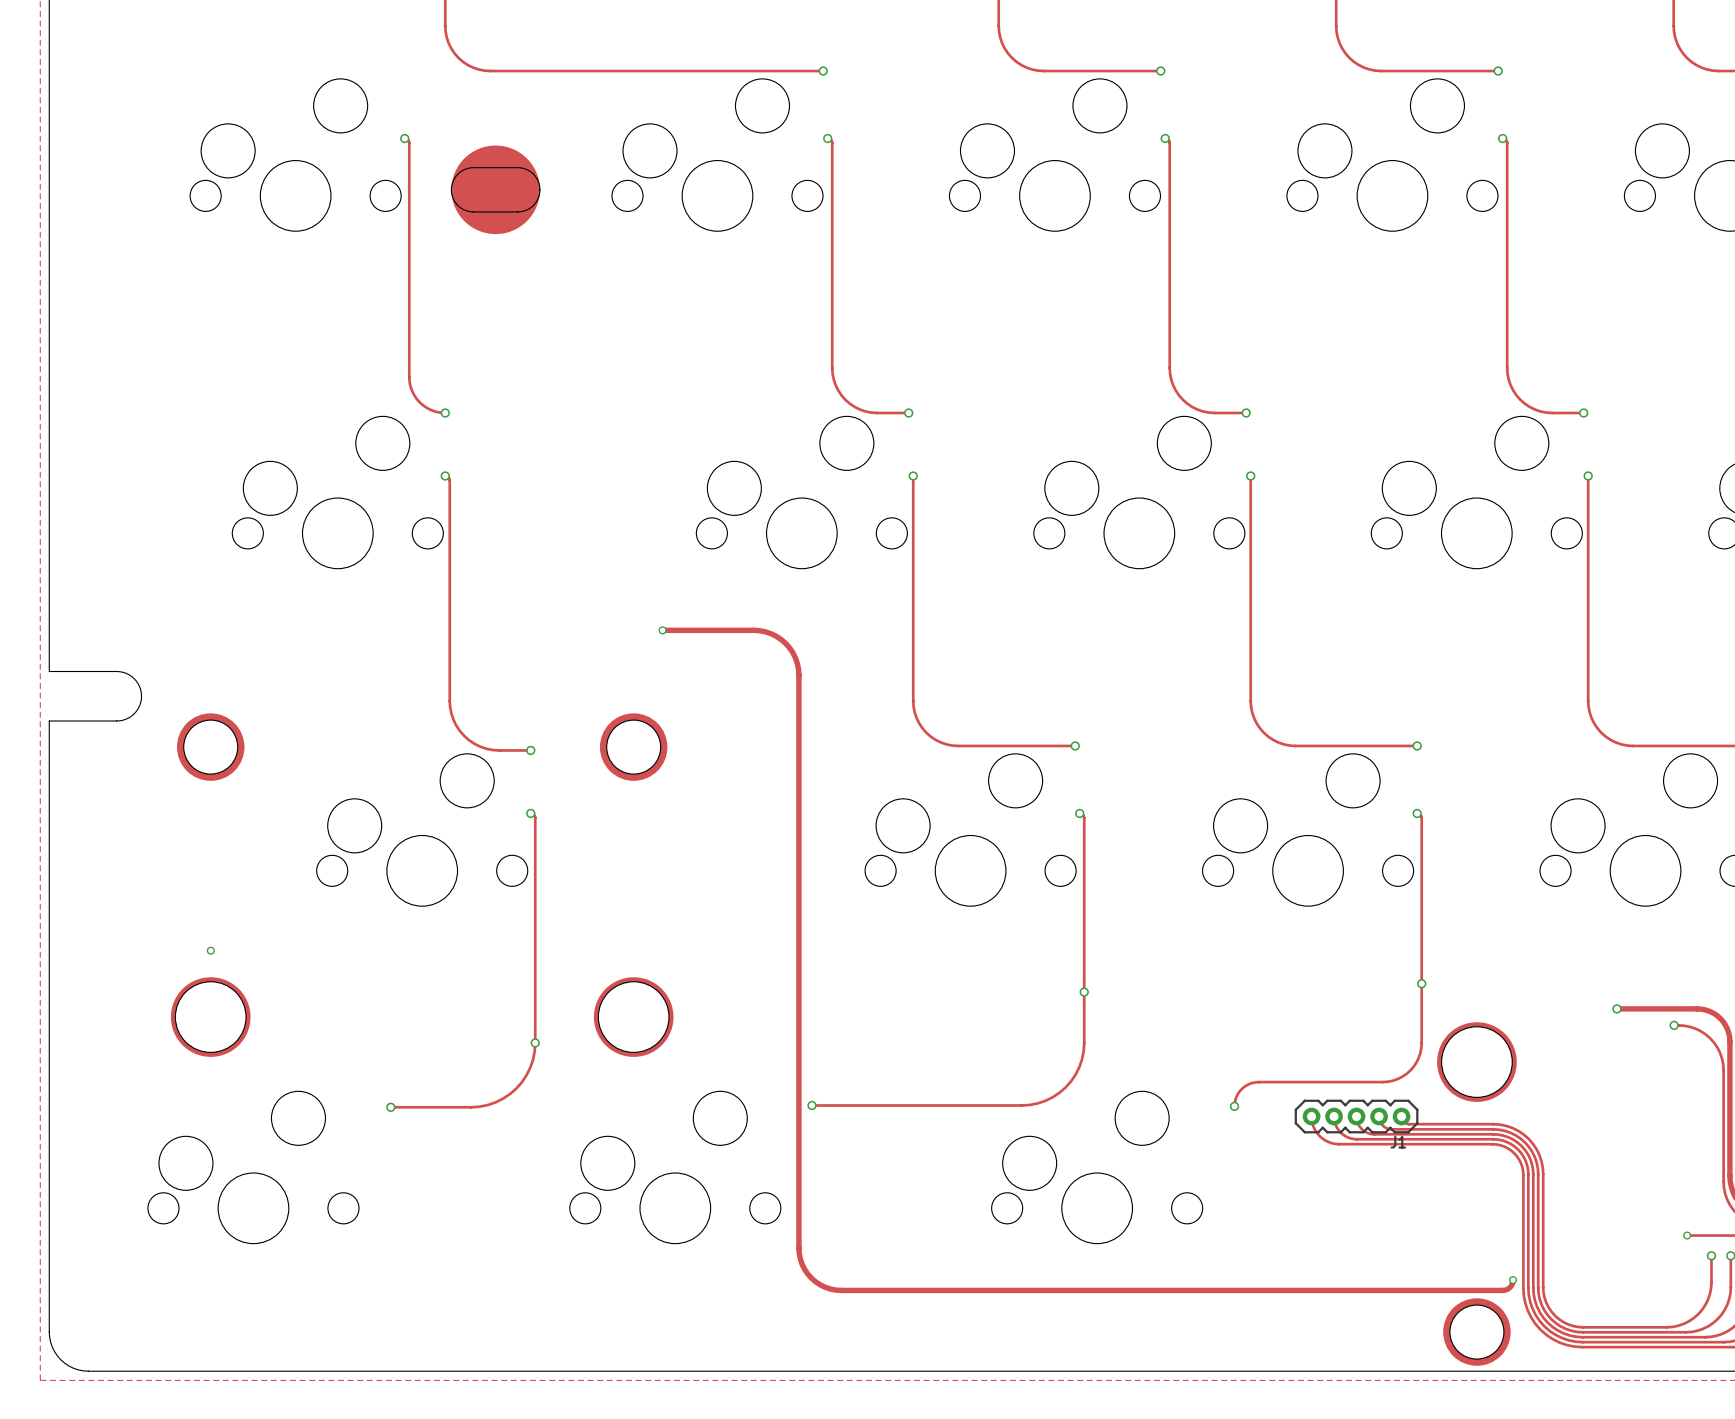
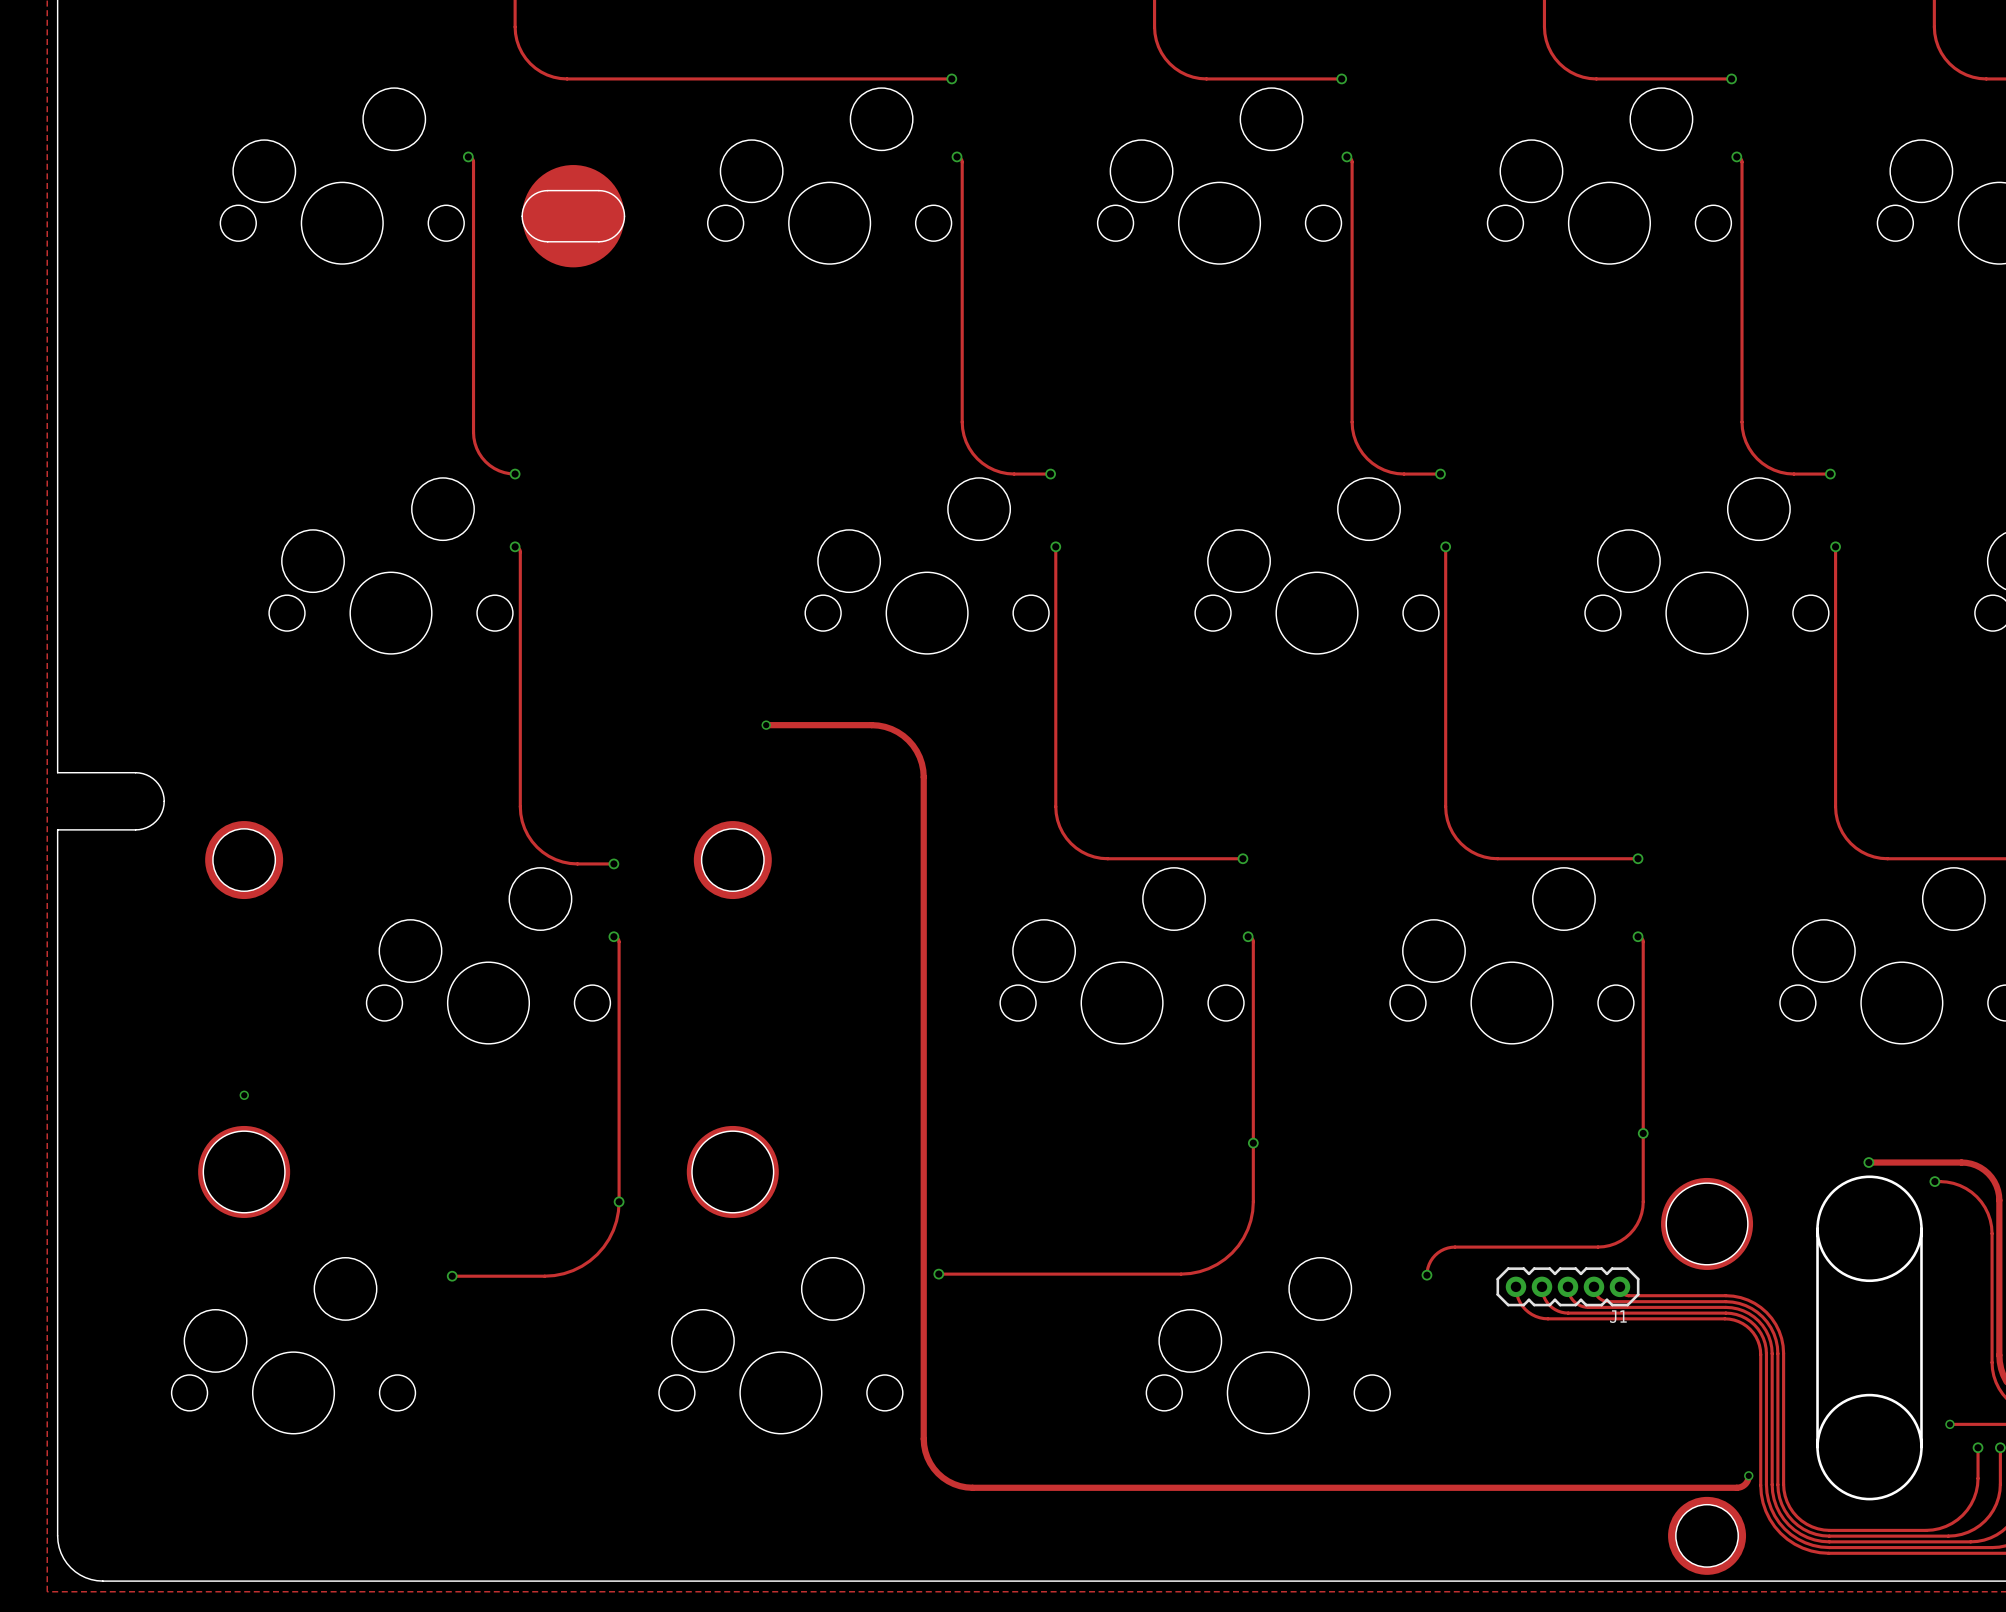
part: none -> (1869, 1337)

